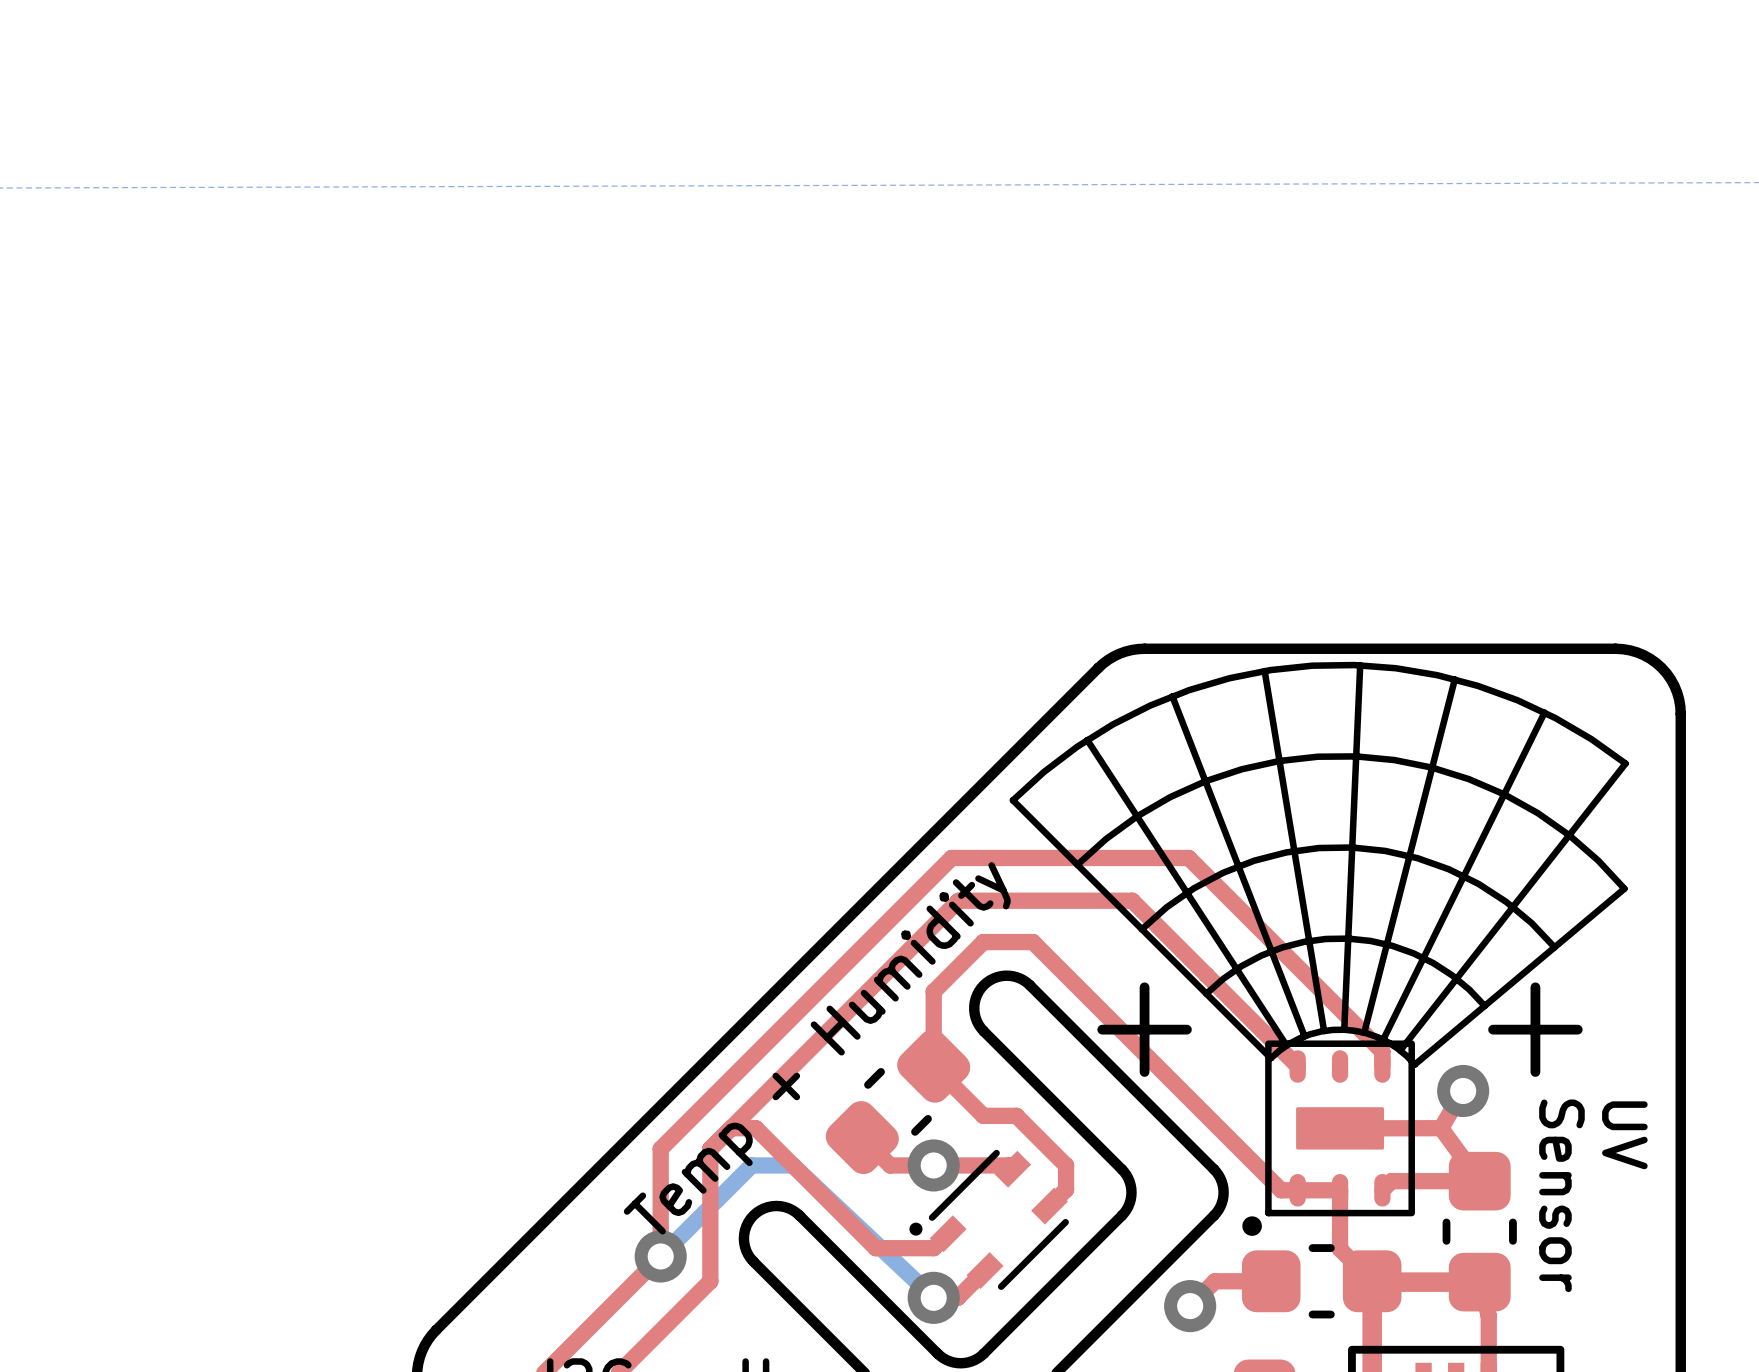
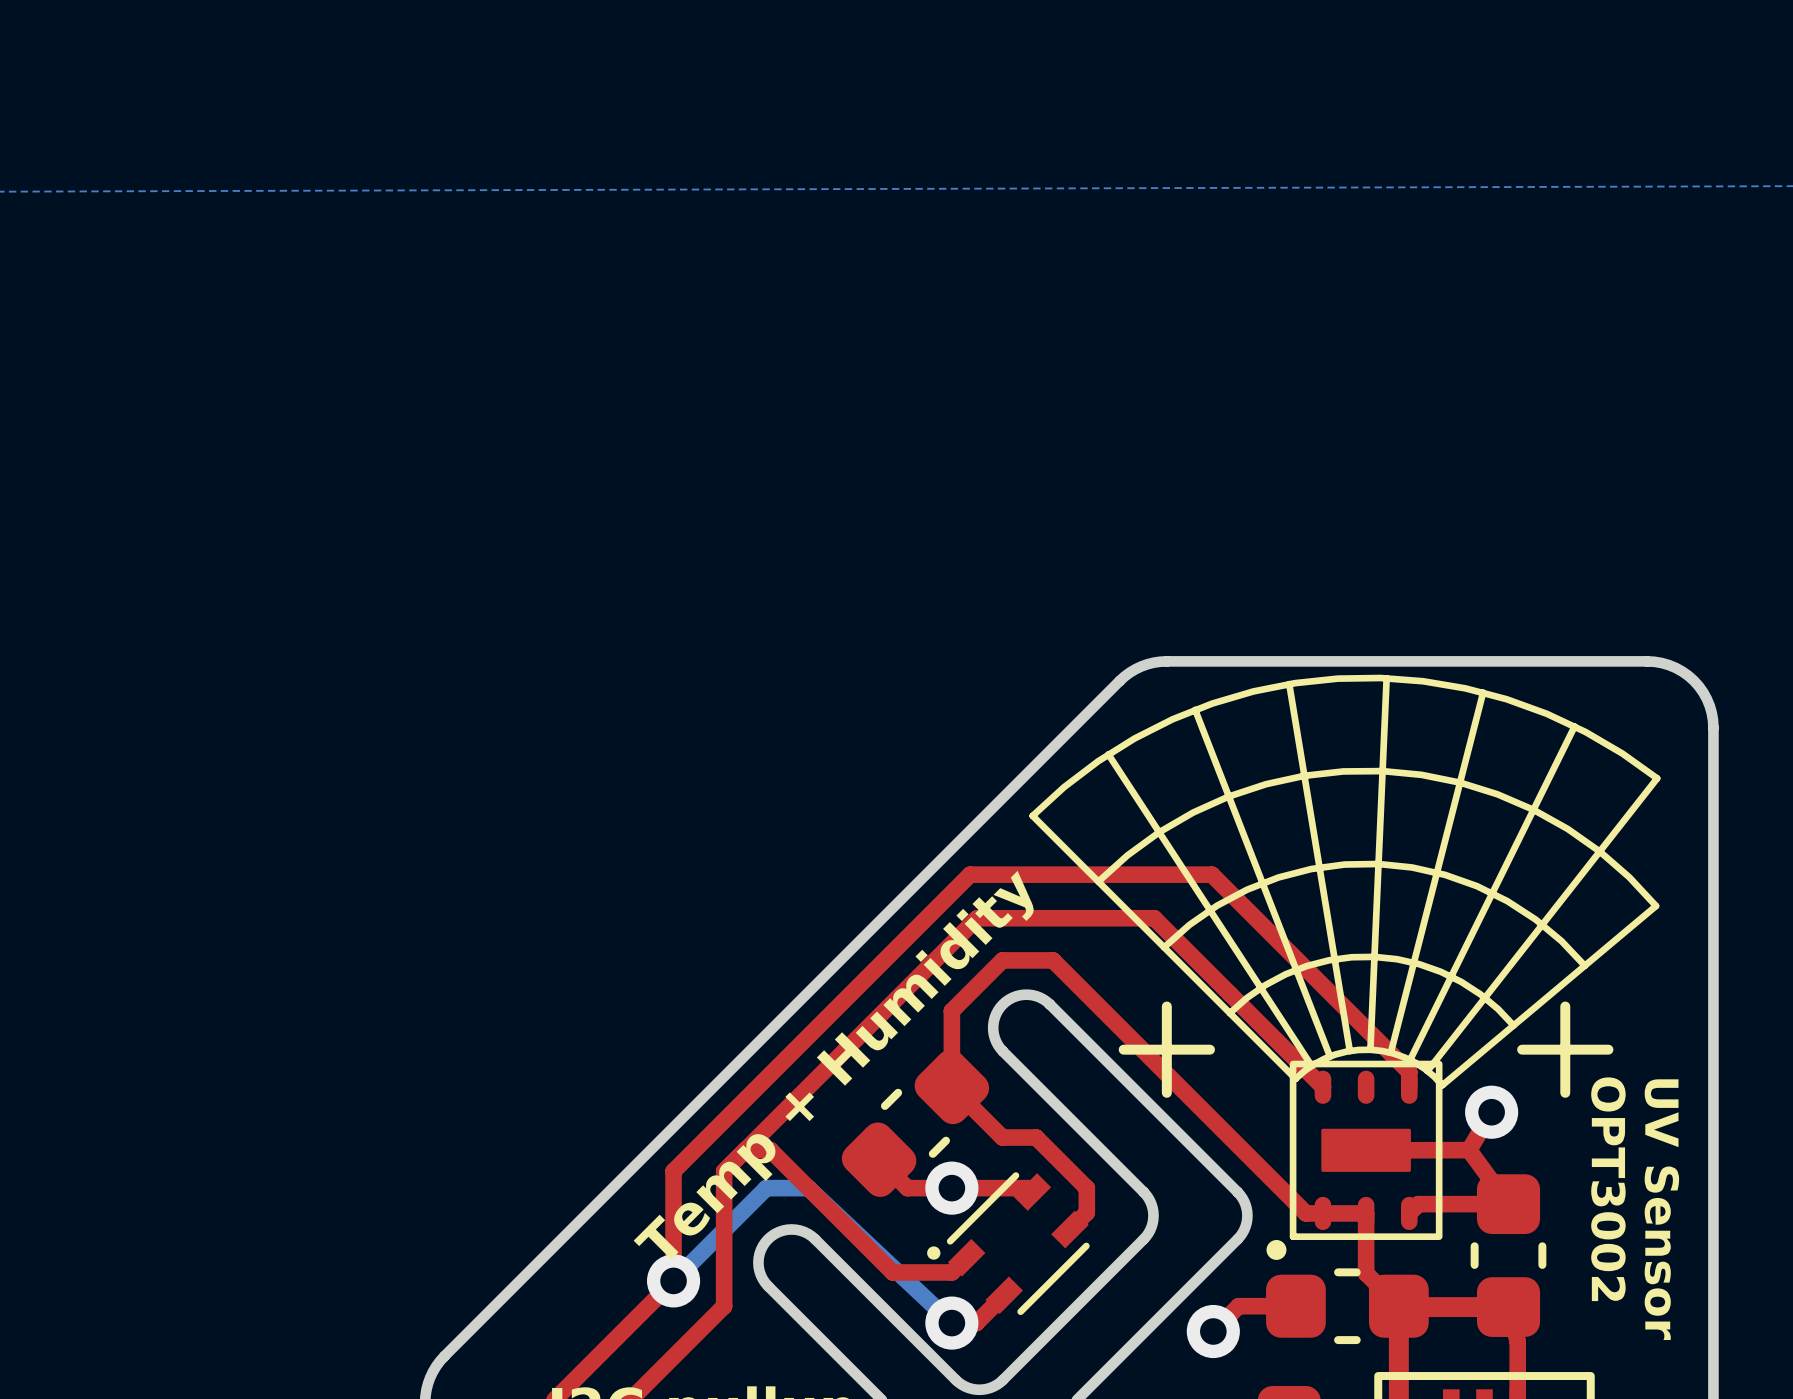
text: UV (1624, 1135) -> none
text: none -> OPT3002 (1608, 1189)
text: Sensor (1561, 1195) -> UV Sensor (1661, 1209)

